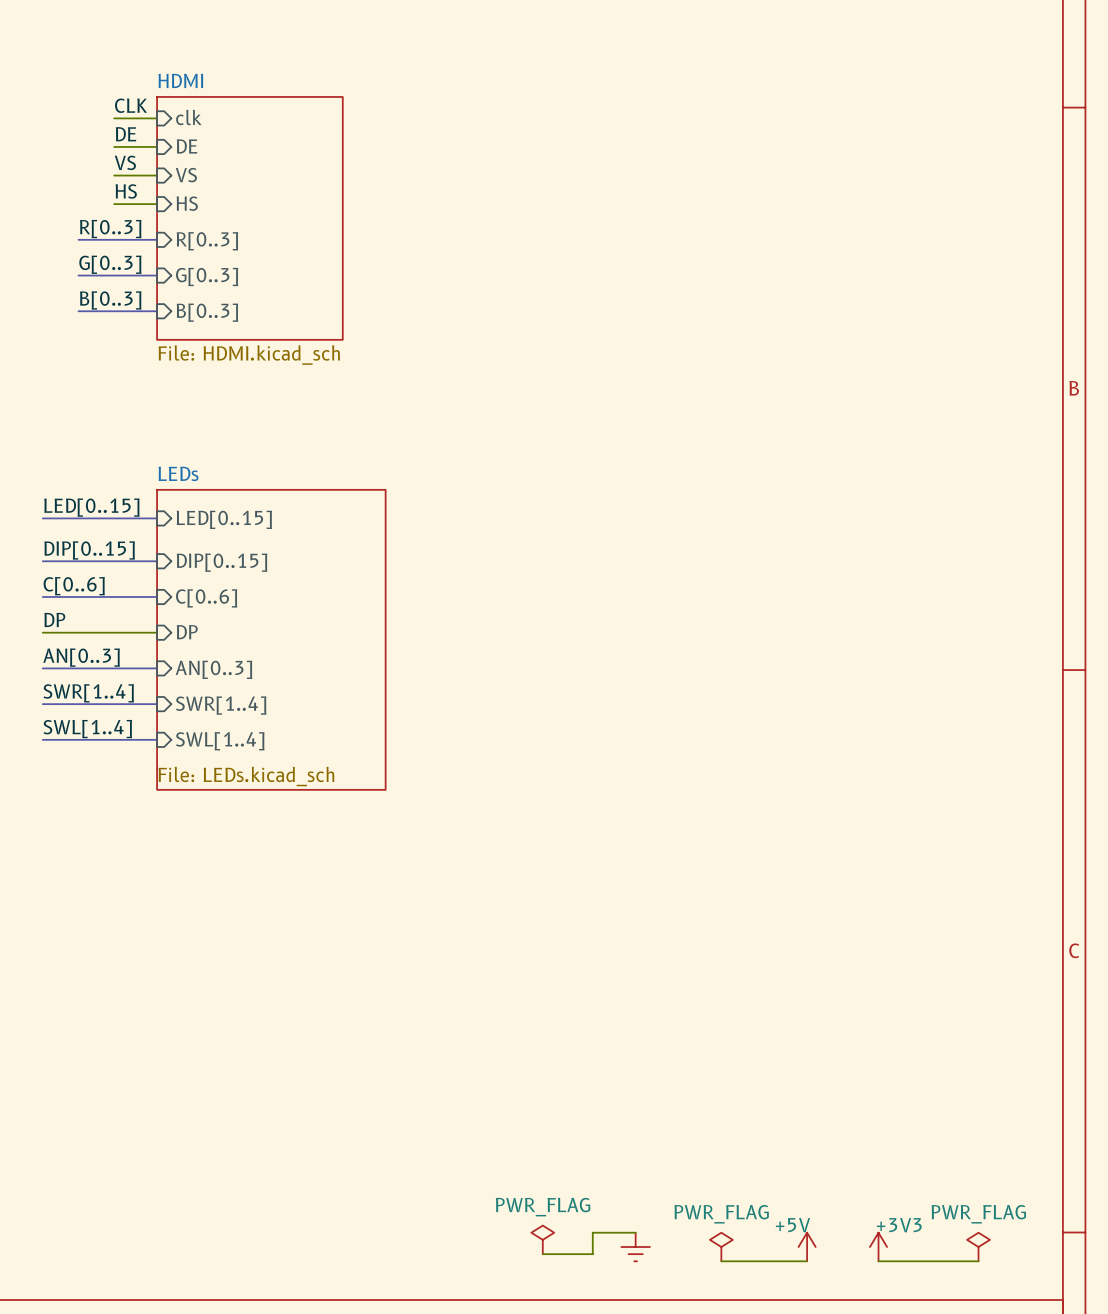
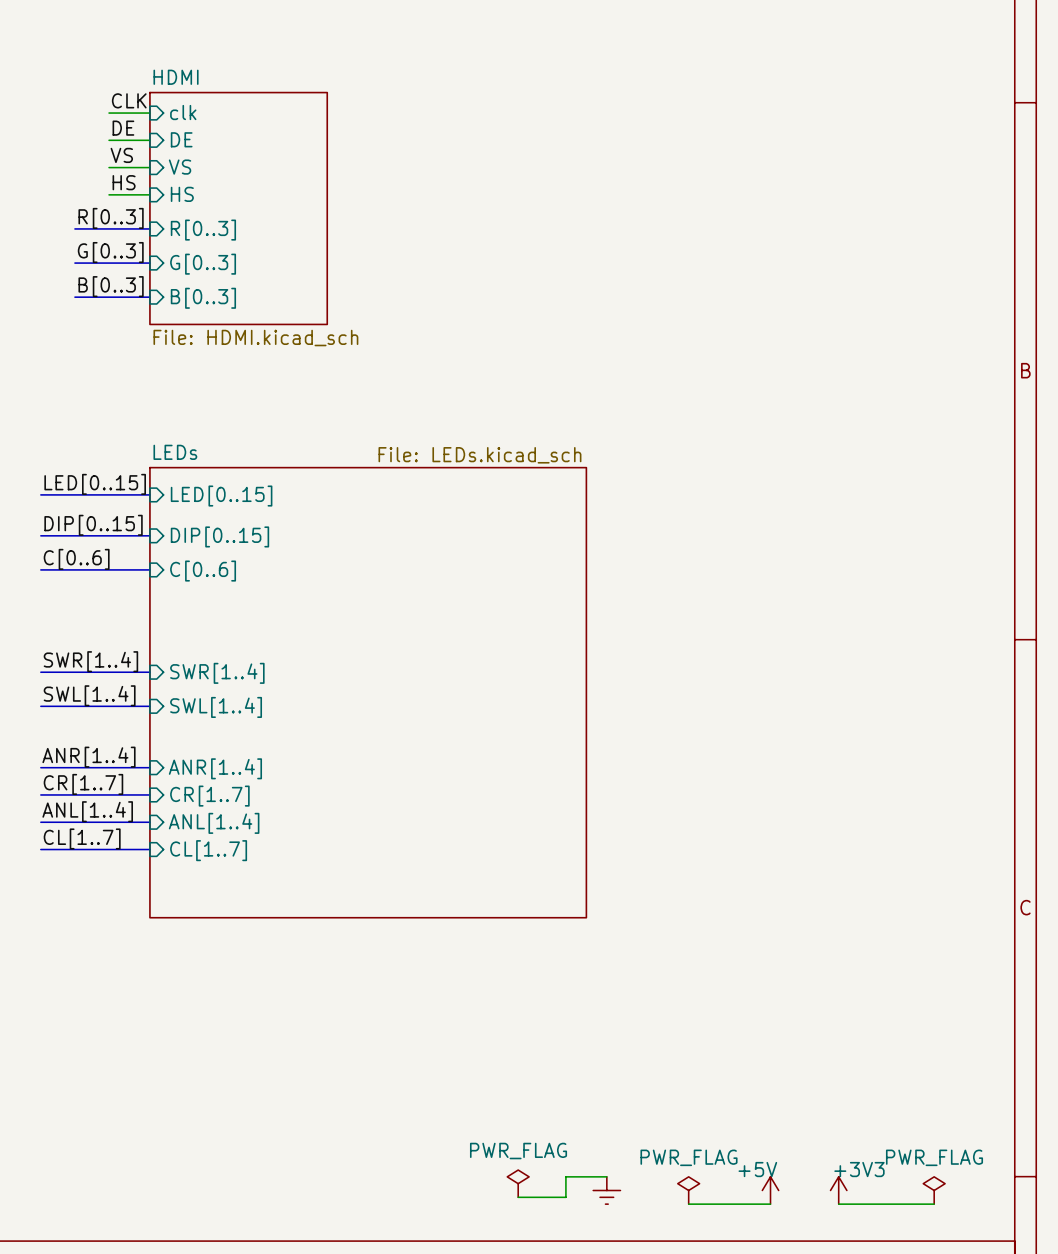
label: DP (54, 619) -> none
wire: (42, 632) (157, 632) -> none
sheet pin: DP (187, 632) -> none
sheet LEDs: File: LEDs.kicad_sch (271, 639) -> none
label: AN[0..3] (81, 657) -> none
bus: (42, 668) (157, 668) -> (40, 767) (149, 767)
sheet pin: AN[0..3] (214, 669) -> none
sheet LEDs: none -> File: LEDs.kicad_sch (368, 692)
label: none -> ANR[1..4] (88, 757)
sheet pin: none -> ANR[1..4] (215, 768)
label: none -> CR[1..7] (83, 784)
bus: none -> (40, 794) (149, 794)
sheet pin: none -> CR[1..7] (209, 796)
label: none -> ANL[1..4] (87, 811)
bus: none -> (40, 822) (149, 822)
sheet pin: none -> ANL[1..4] (214, 823)
label: none -> CL[1..7] (82, 838)
bus: none -> (40, 849) (149, 849)
sheet pin: none -> CL[1..7] (208, 850)

